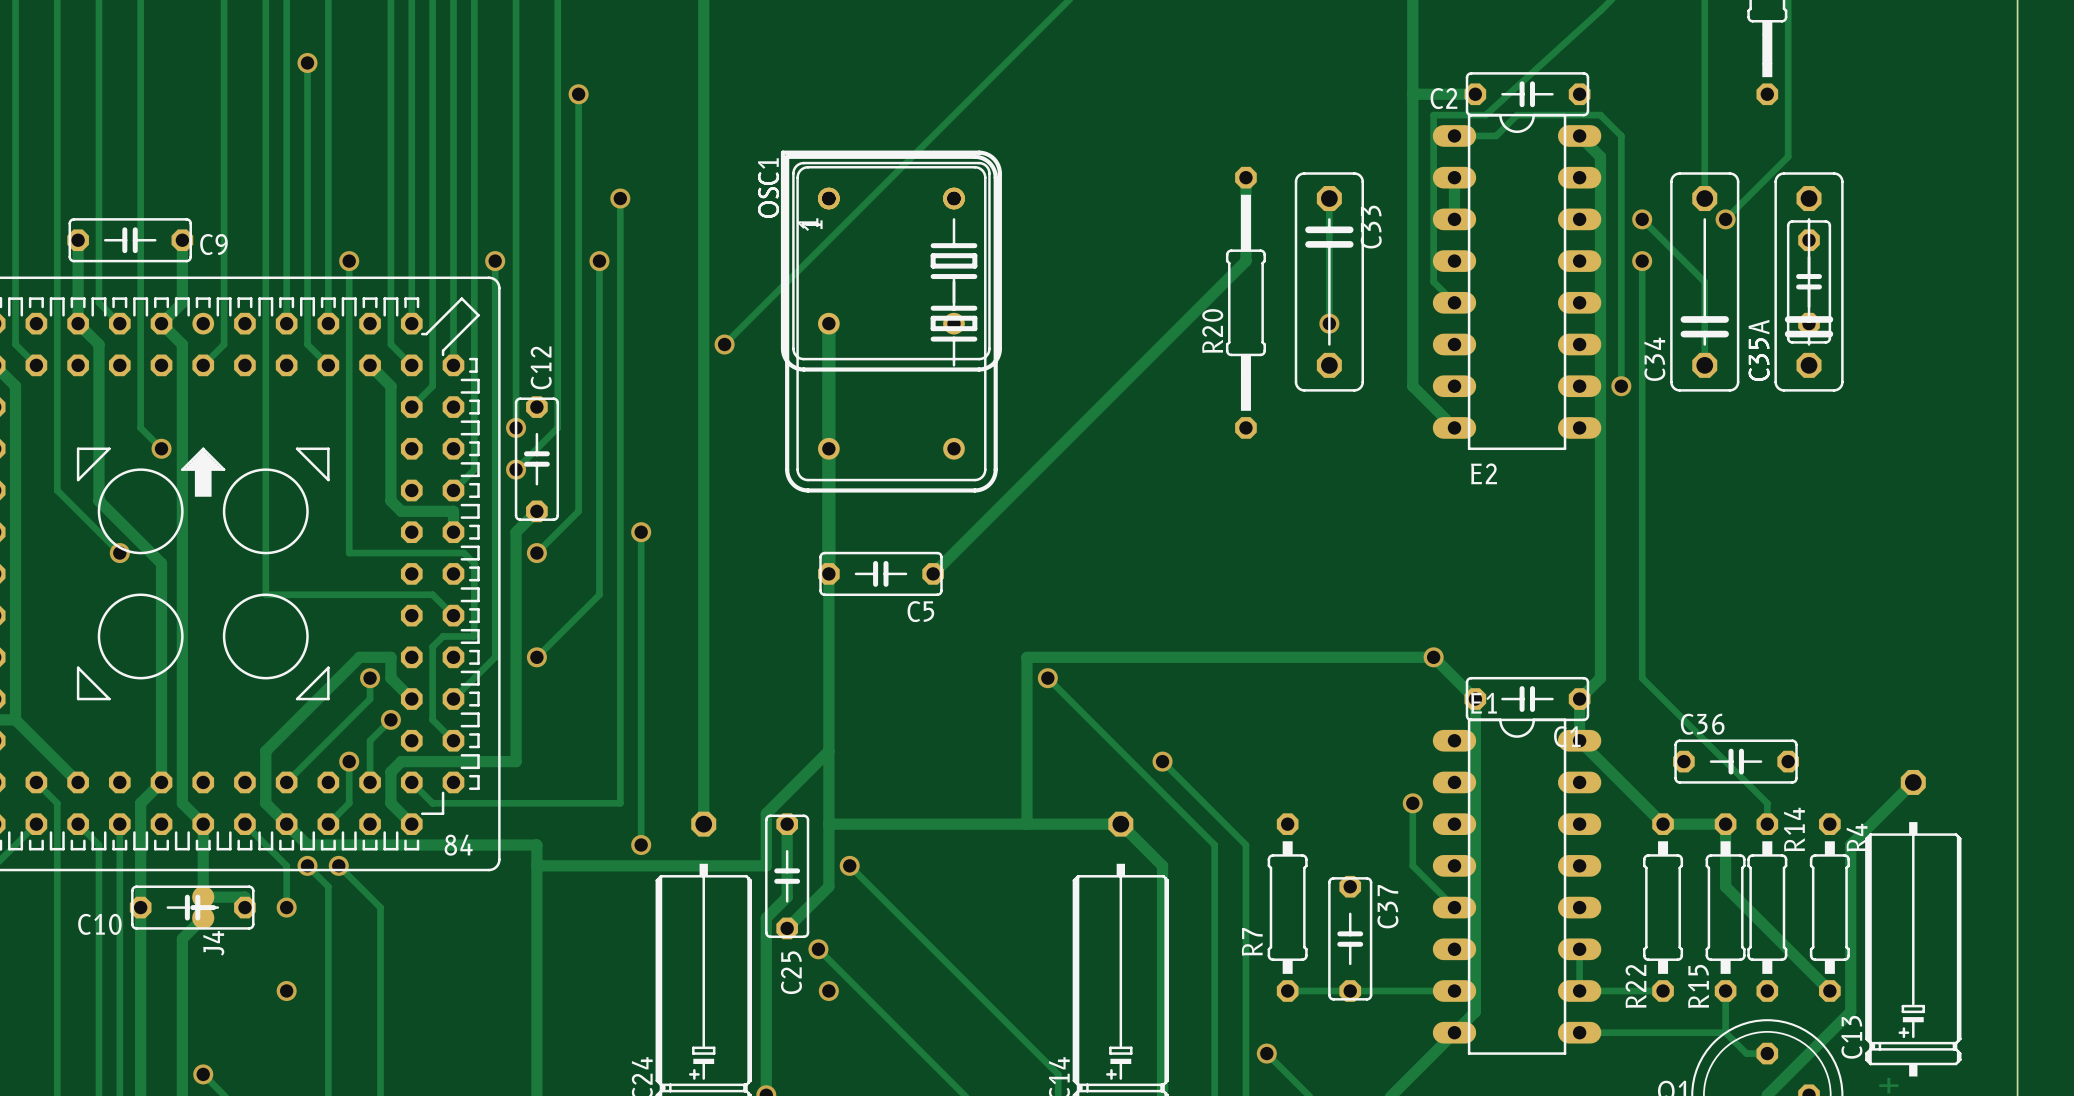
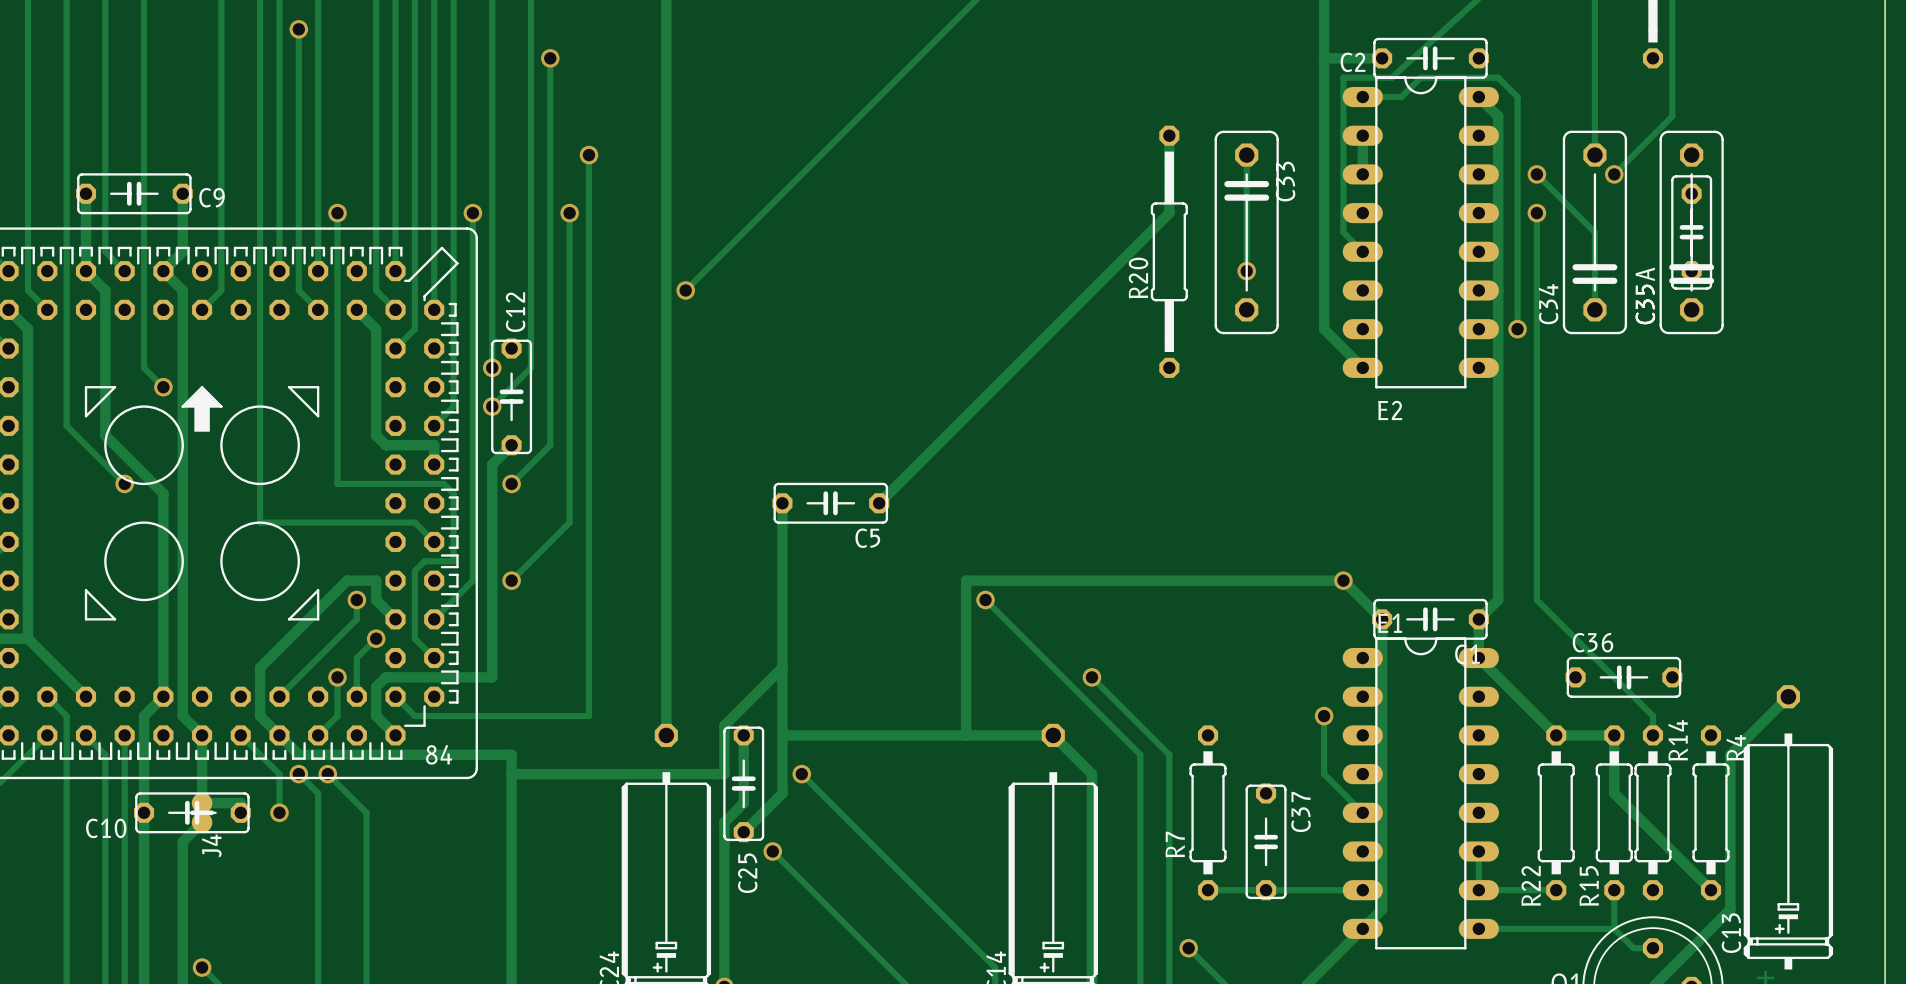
part: (891, 261) -> none
track: (828, 323) (828, 573) -> none
part: (891, 323) -> none
track: (641, 532) (641, 845) -> none
via: (641, 532) -> none
via: (641, 845) -> none
via: (286, 990) -> none
via: (828, 990) -> none

